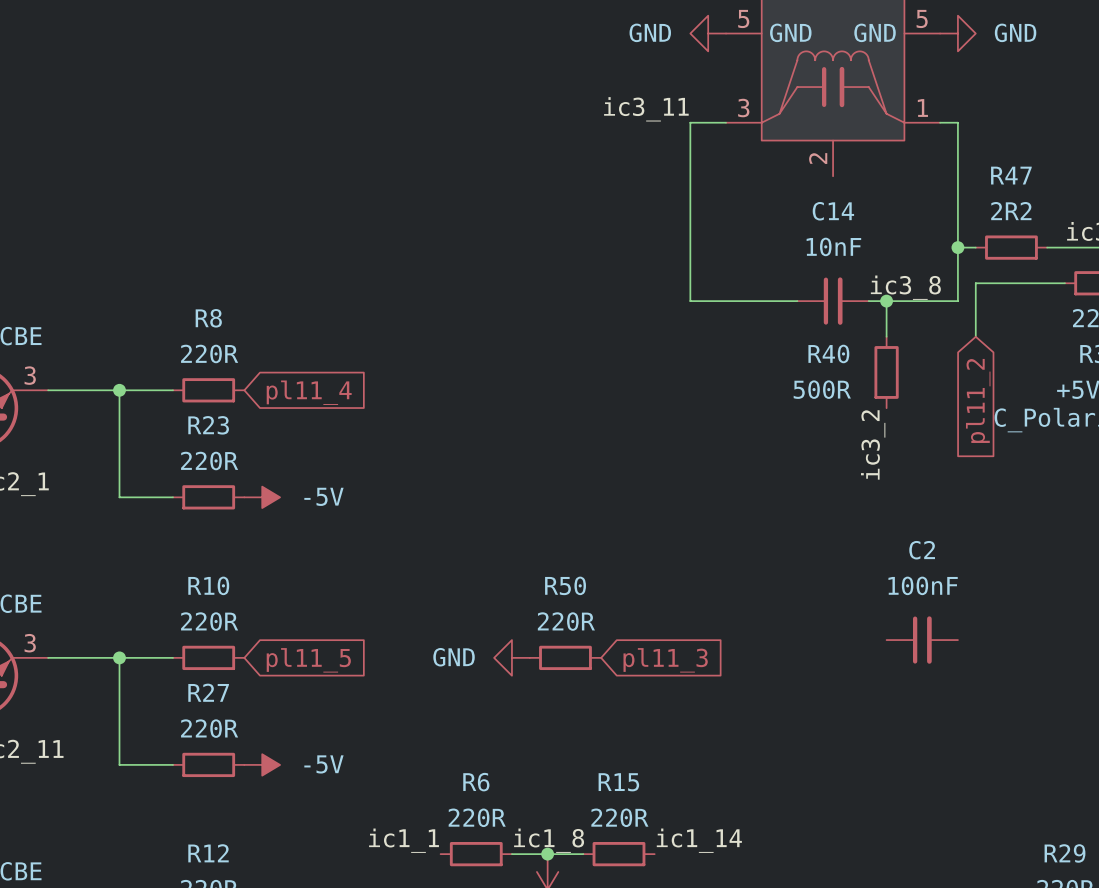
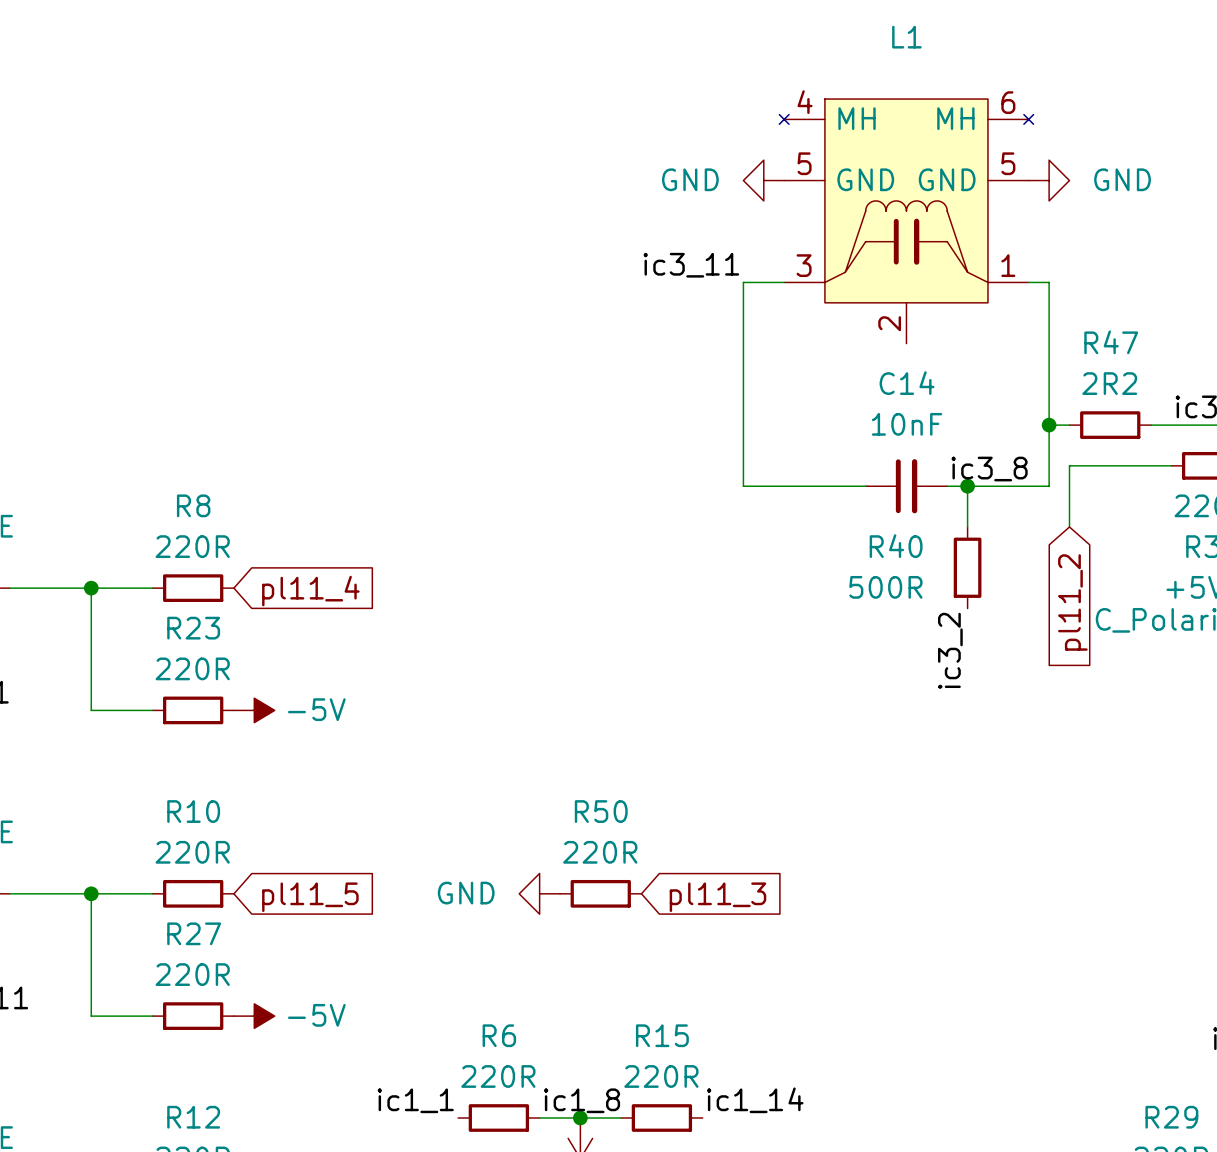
C2: 100nF (922, 640) -> none

